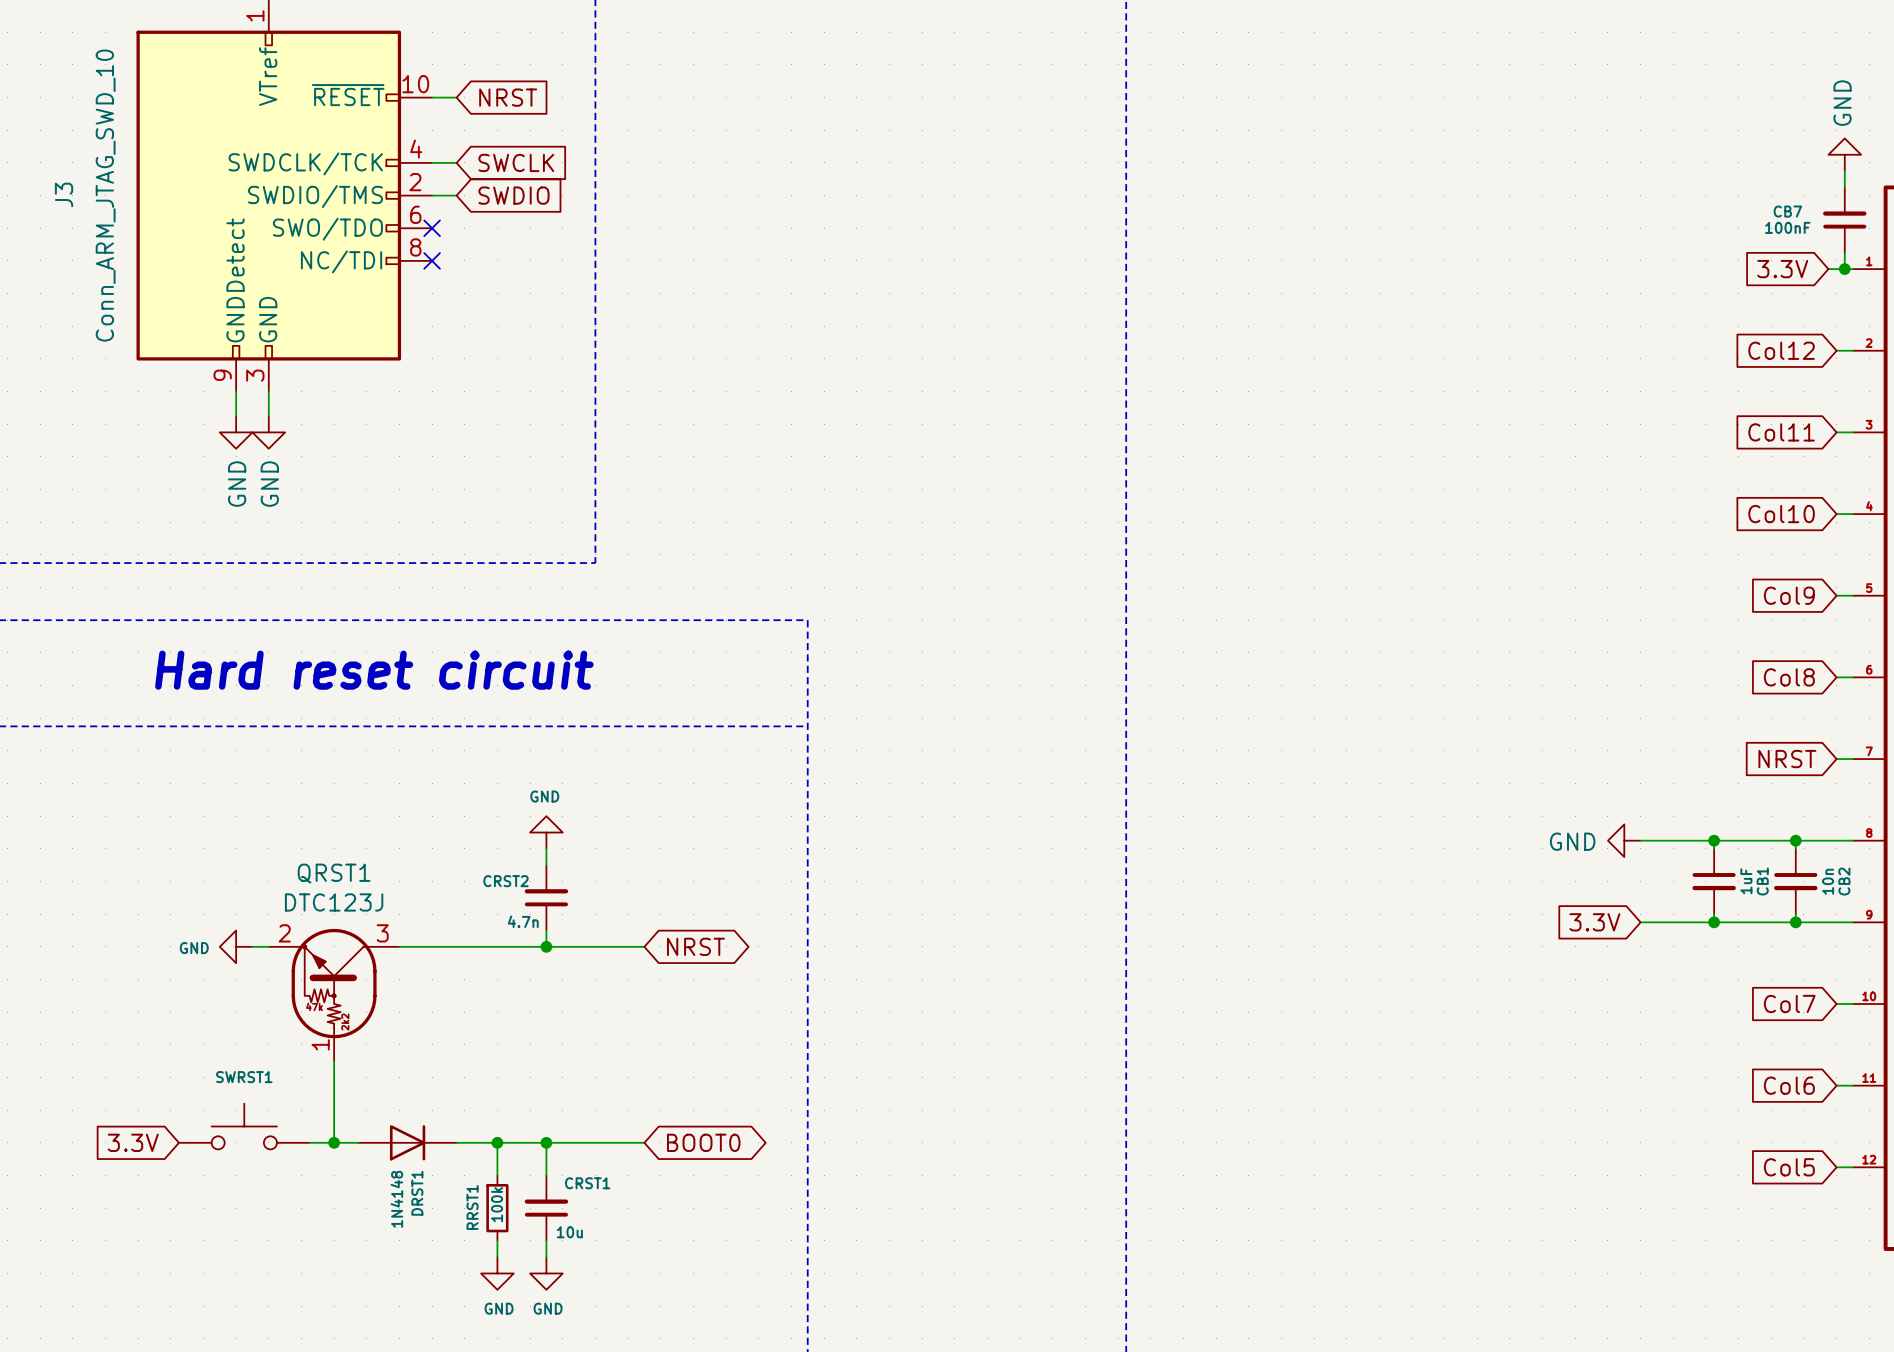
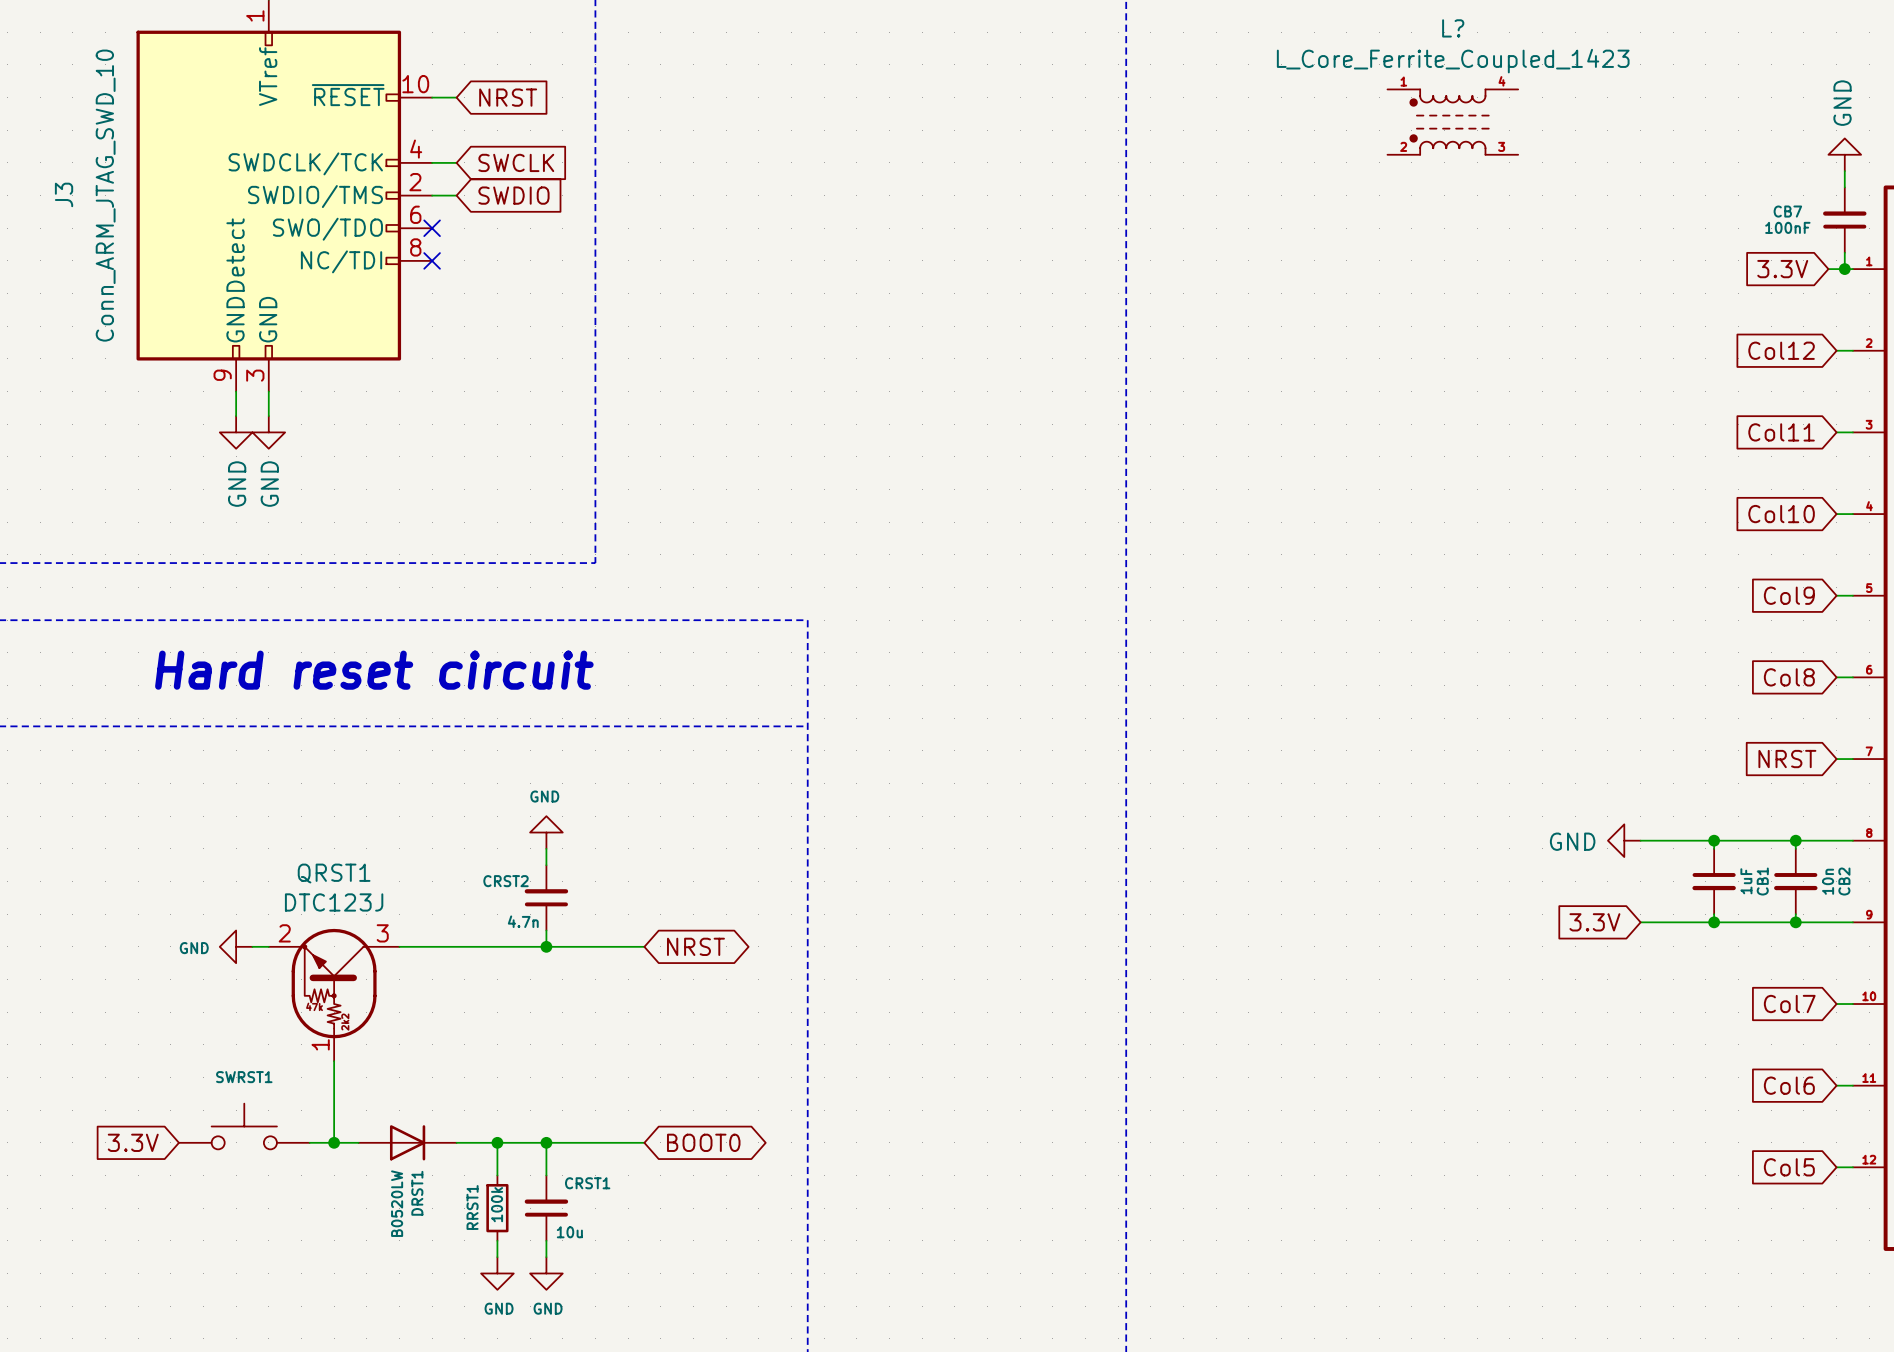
L?: none -> L_Core_Ferrite_Coupled_1423 (1452, 122)
DRST1 value: 1N4148 (396, 1199) -> B0520LW (397, 1203)

